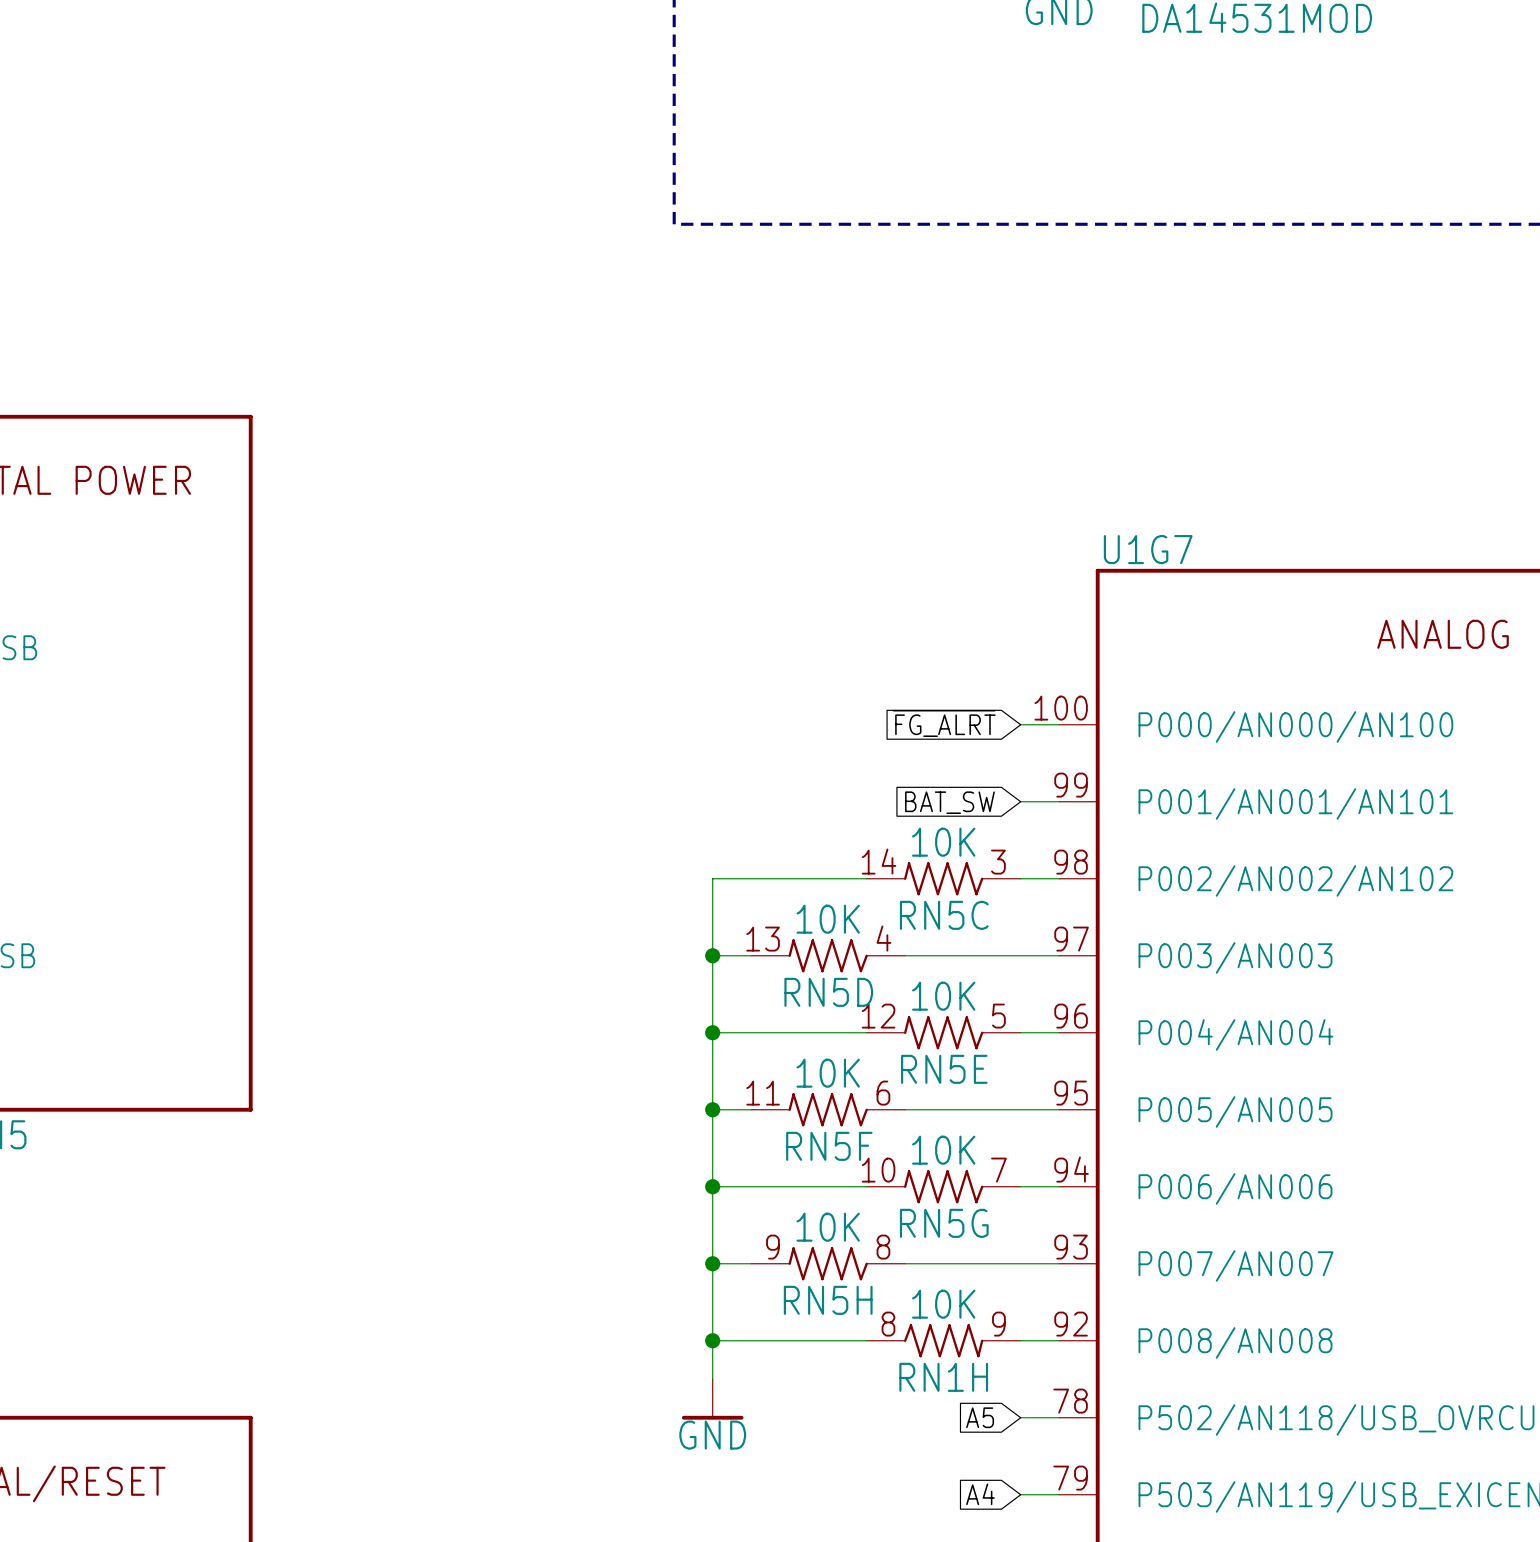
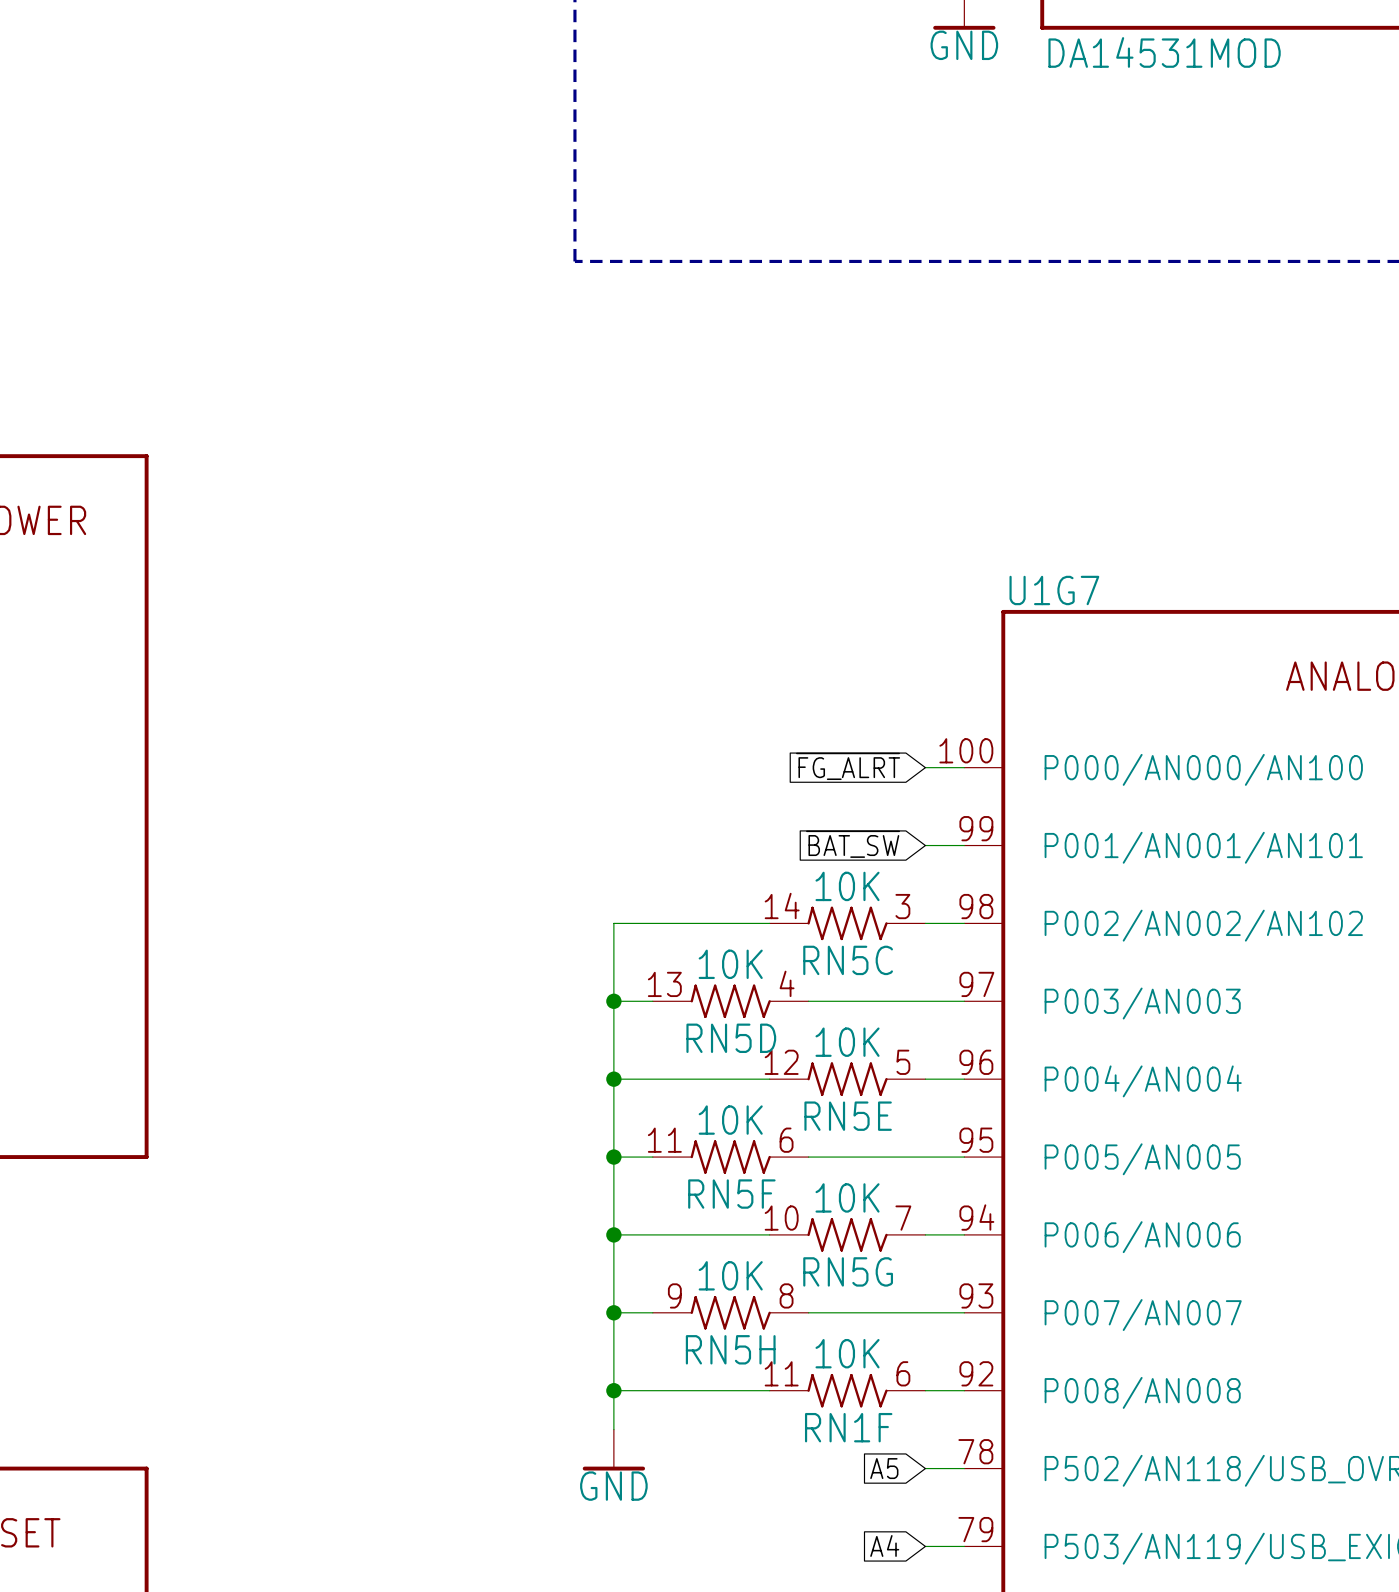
global label: BAT_SW (949, 802) -> ~{BAT_SW} (853, 844)
RN1H: 10K (943, 1340) -> none
RN1F: none -> 10K (847, 1390)

